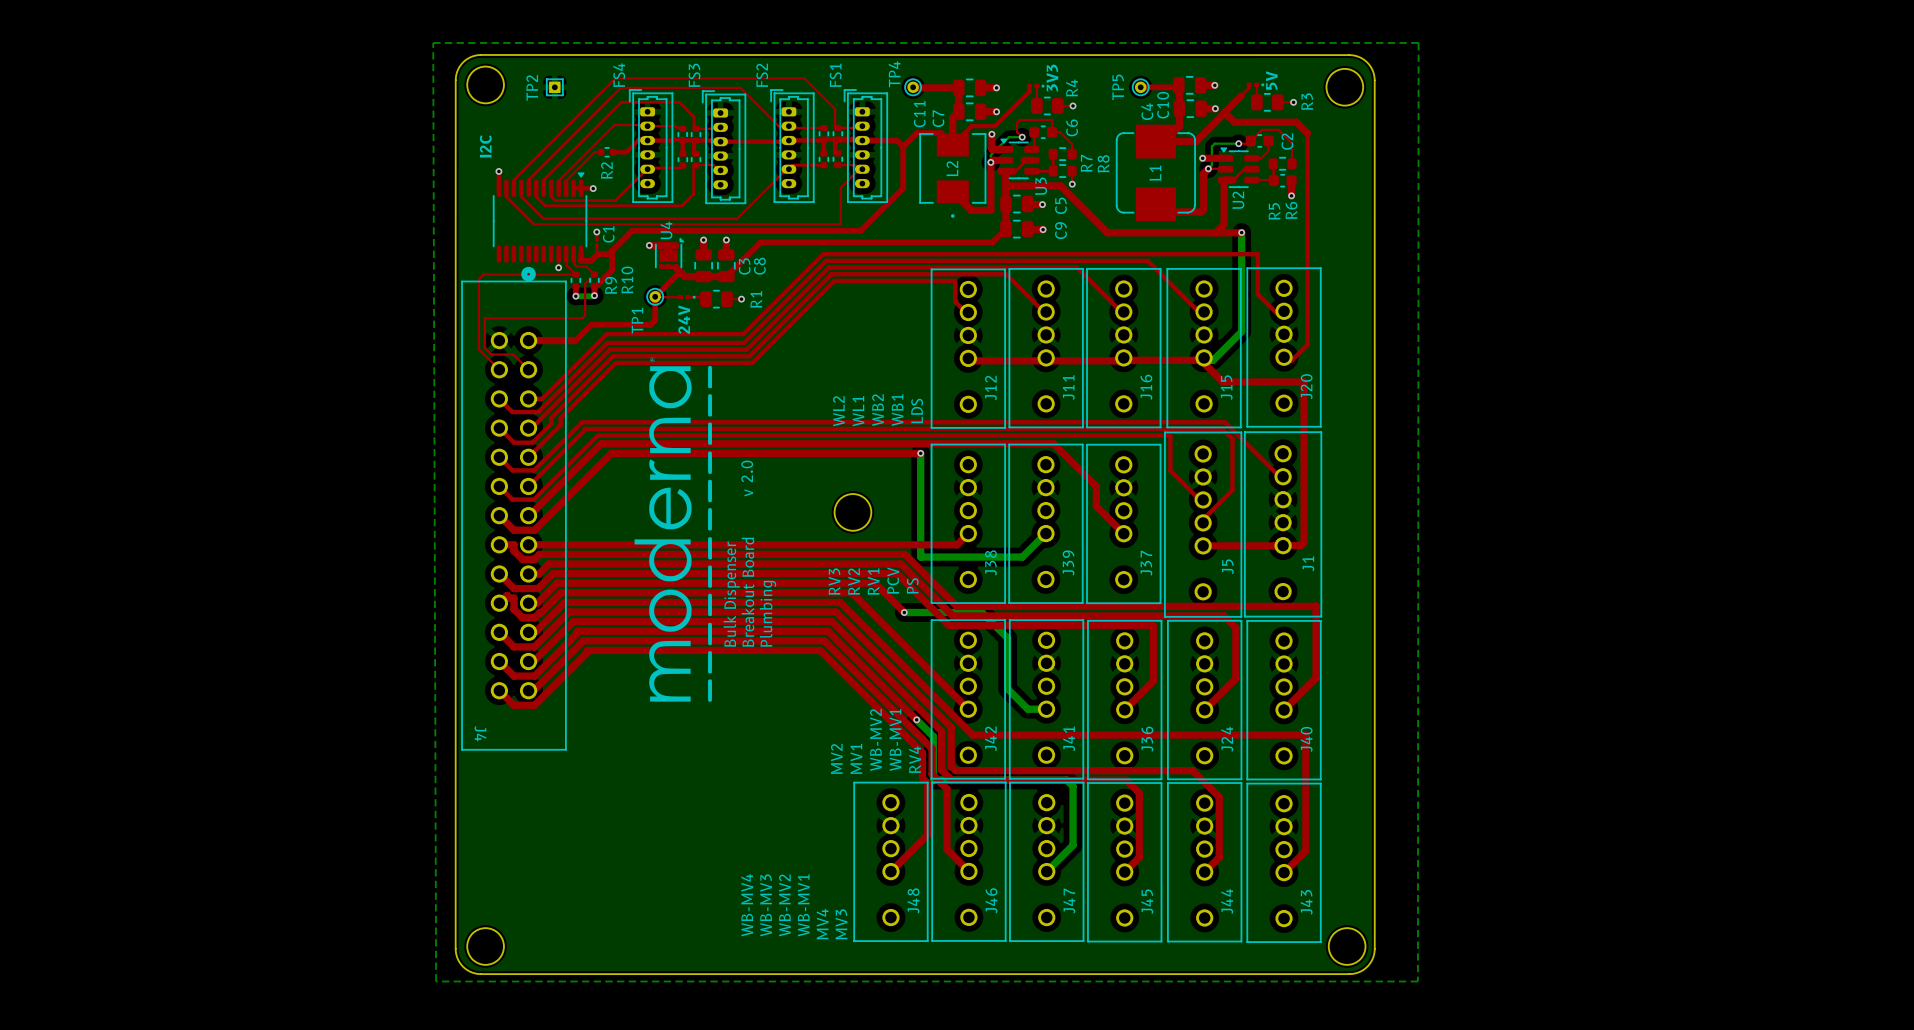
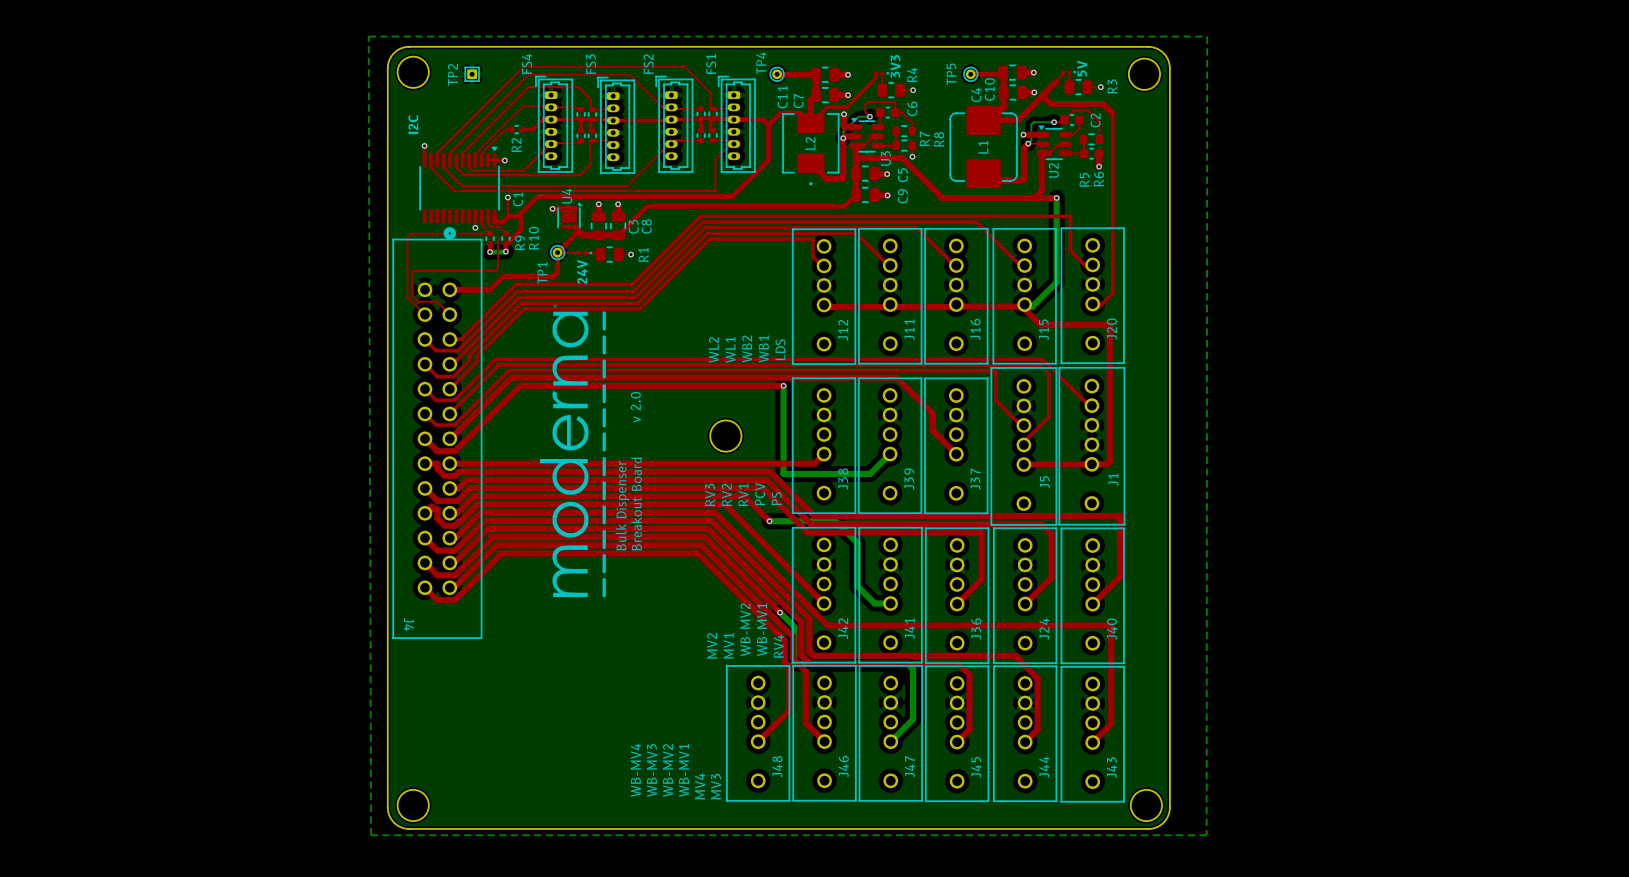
text: Plumbing (767, 613) -> none

